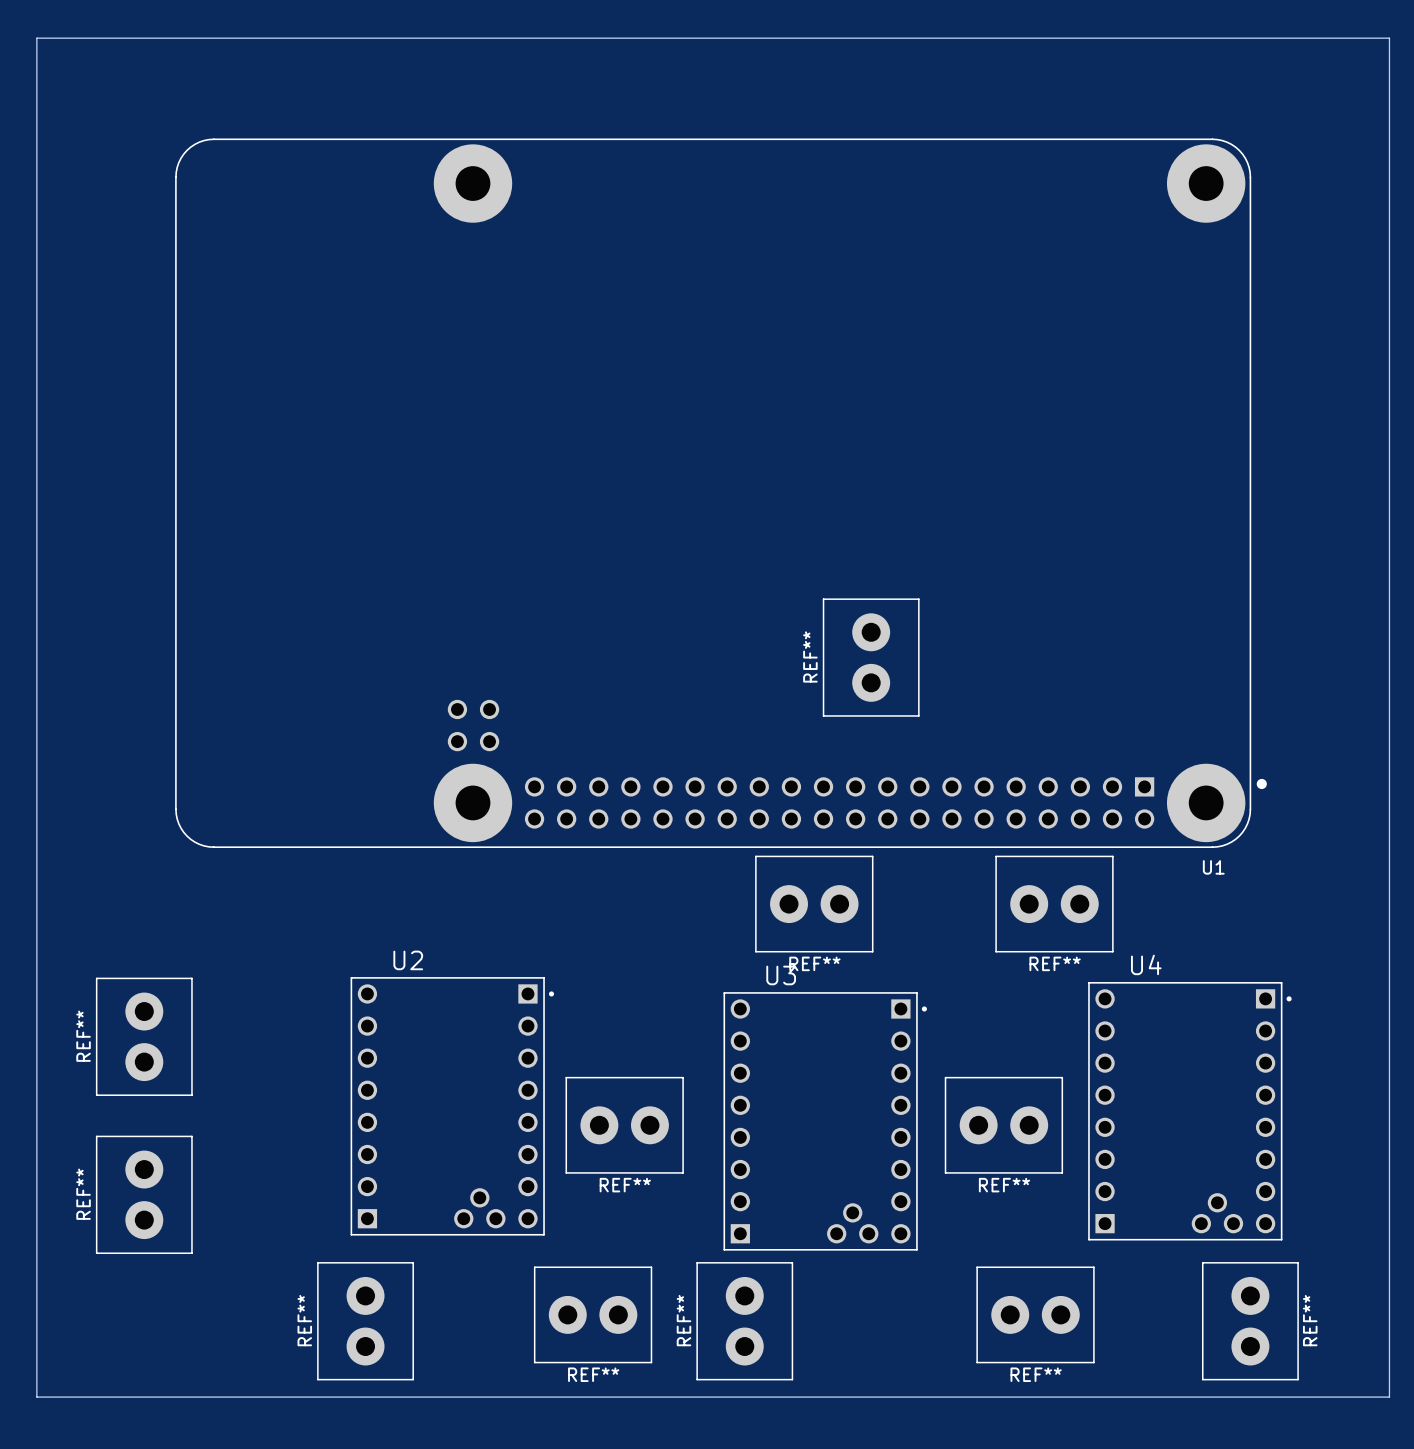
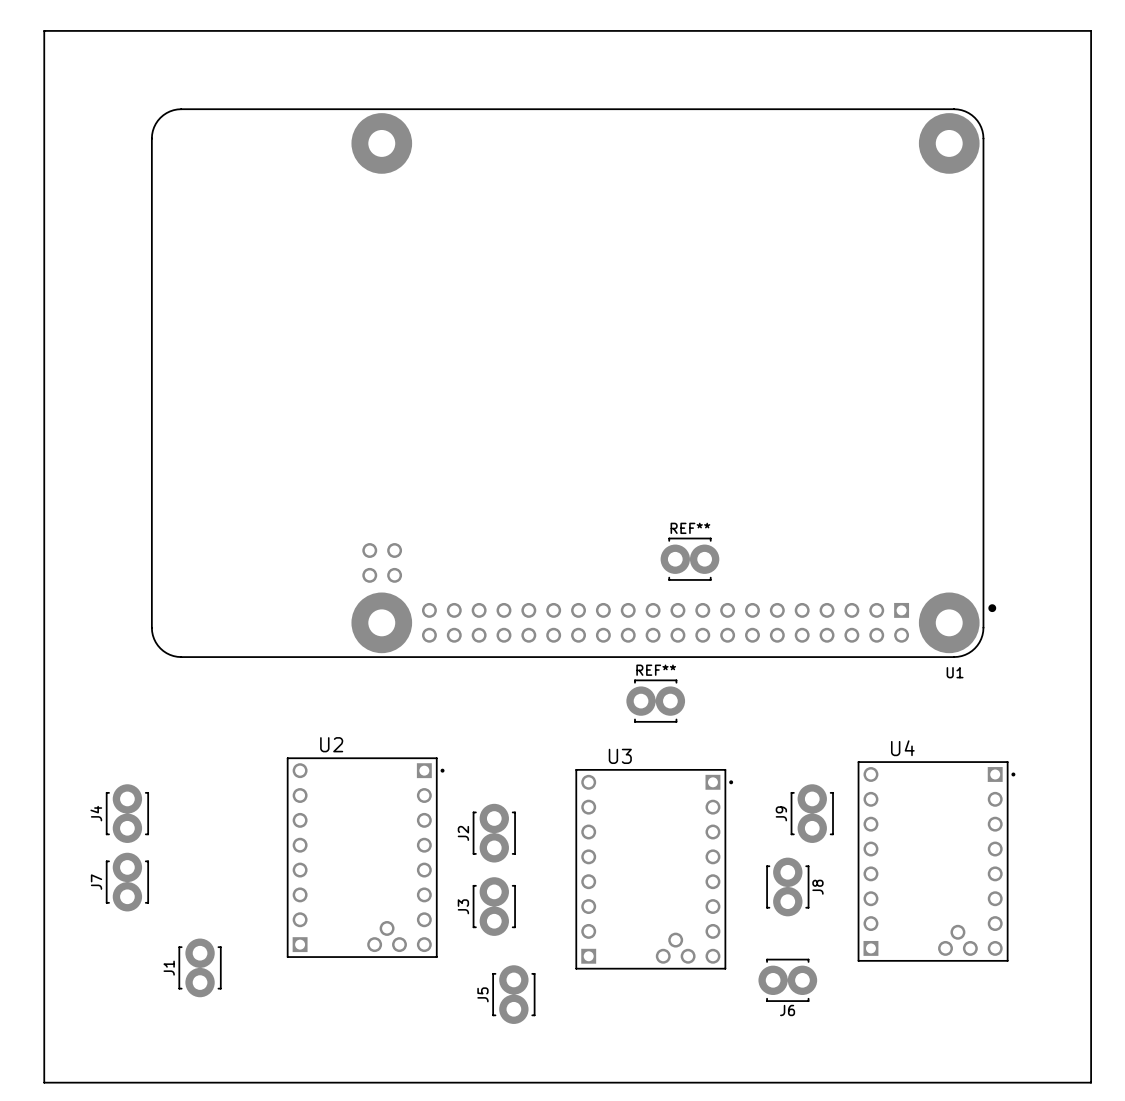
REF**: (871, 657) -> none
REF**: none -> (689, 559)
REF** footprint: [755, 855, 874, 953] -> [626, 679, 686, 723]
REF**: (1054, 904) -> none
REF** name position: REF** (814, 963) -> REF** (656, 670)
REF**: (144, 1036) -> none
J4: none -> (127, 813)
J9: none -> (812, 813)
J2: none -> (494, 833)
REF**: (624, 1125) -> none
REF**: (1003, 1125) -> none
J7: none -> (127, 882)
J8: none -> (787, 886)
J3: none -> (494, 906)
REF**: (144, 1194) -> none
J1: none -> (200, 967)
J6: none -> (787, 980)
J5: none -> (513, 994)
REF**: (593, 1314) -> none
REF**: (1035, 1314) -> none
REF**: (365, 1321) -> none
REF**: (744, 1321) -> none
REF**: (1250, 1321) -> none

